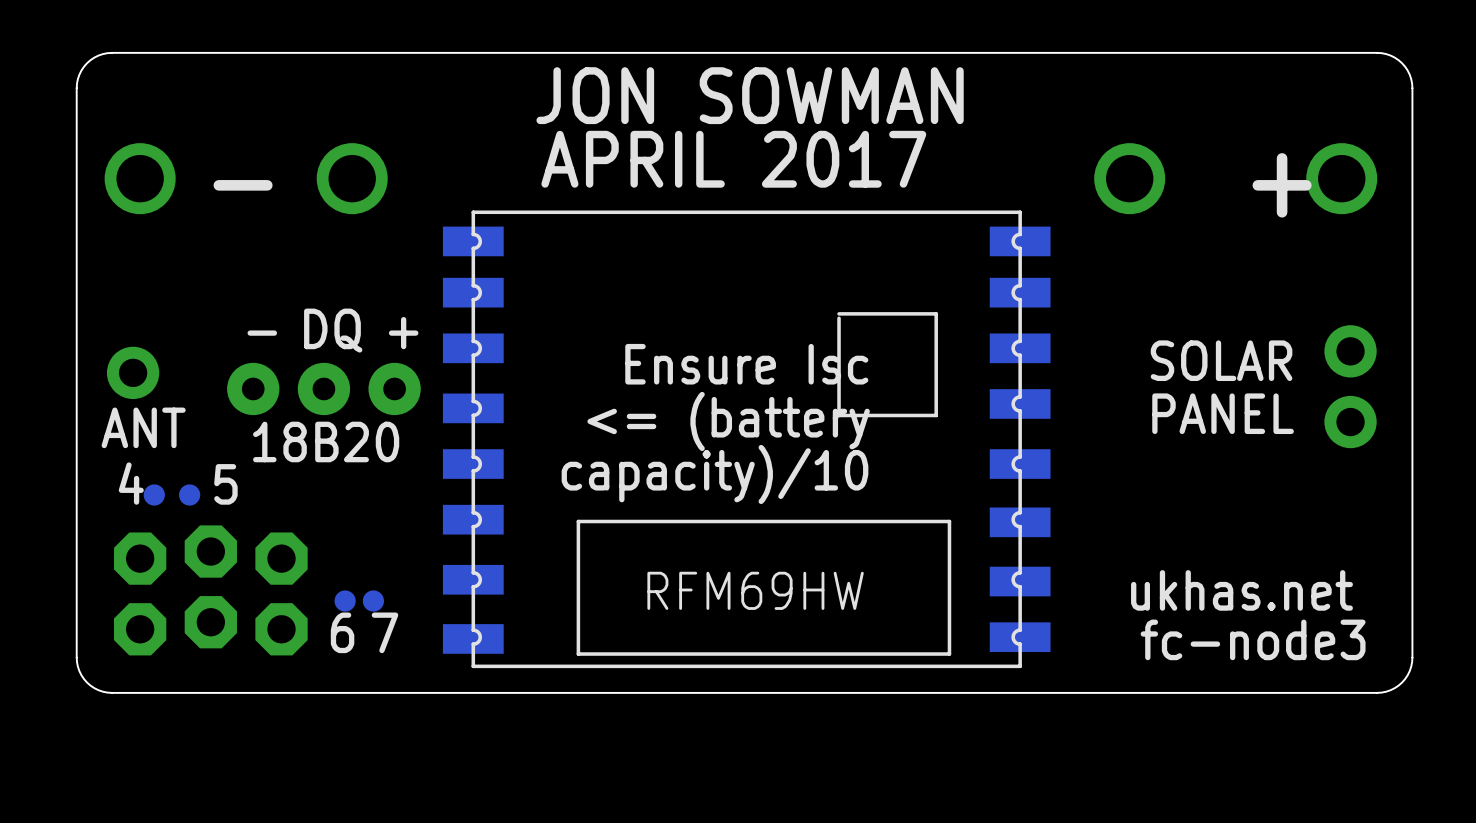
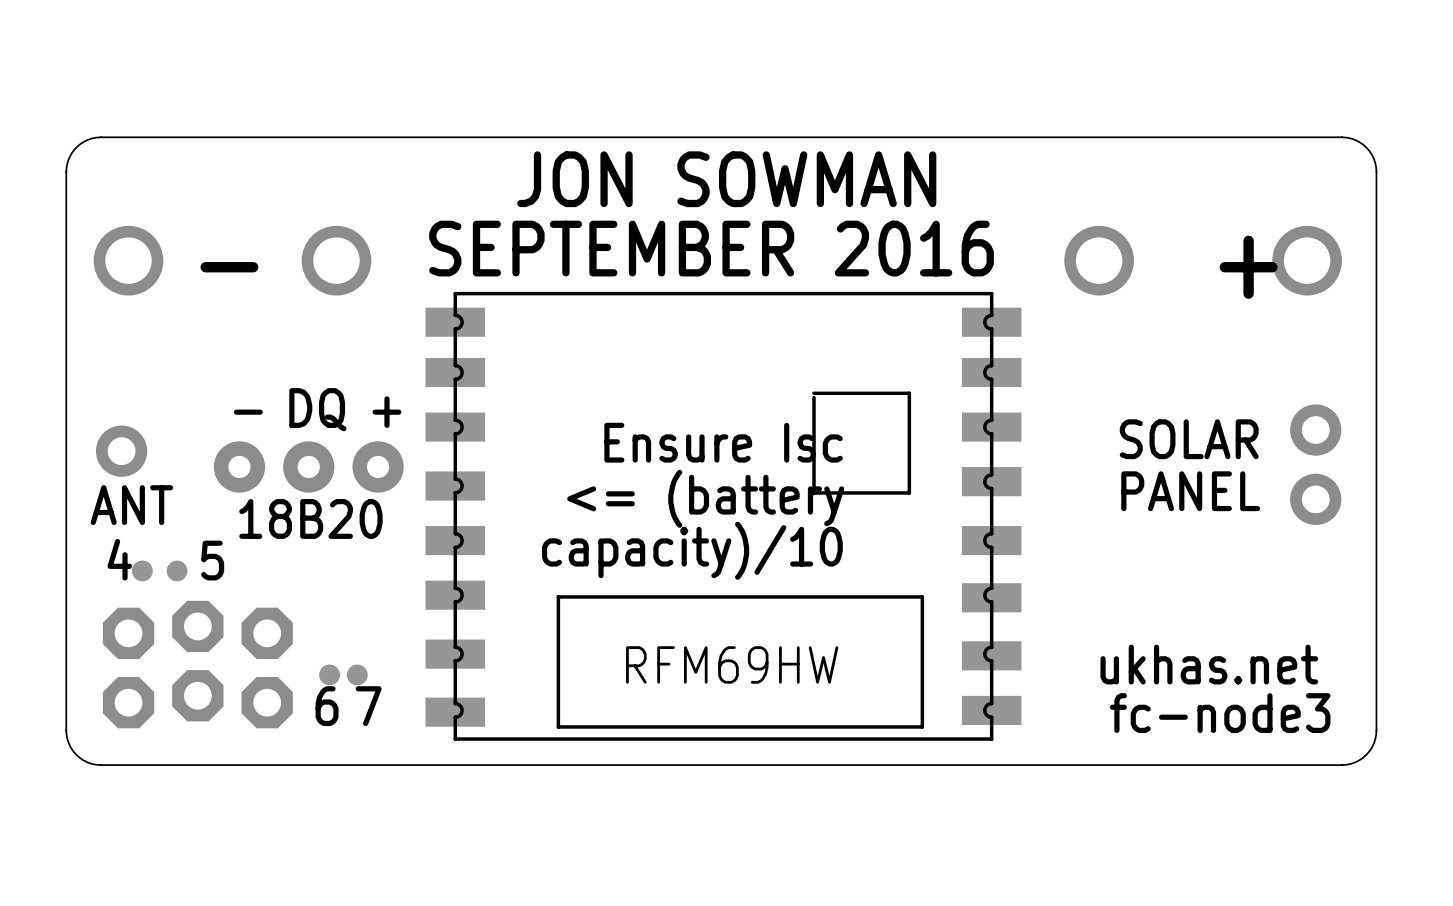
text: APRIL 2017 (733, 159) -> none
text: none -> SEPTEMBER 2016 (711, 248)

